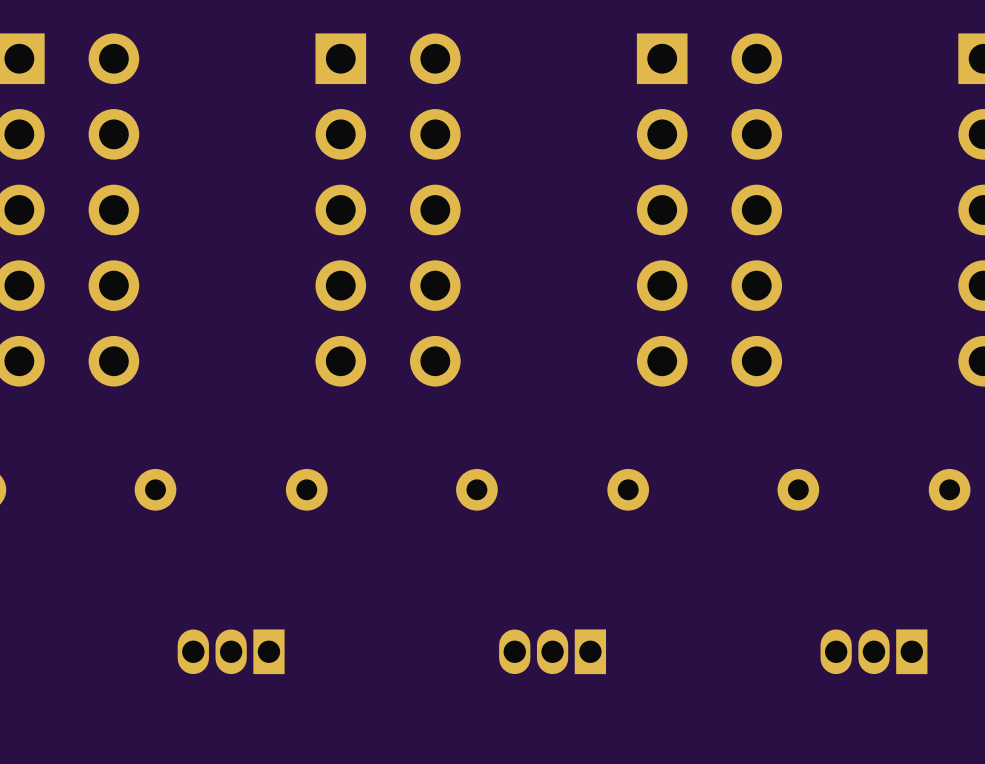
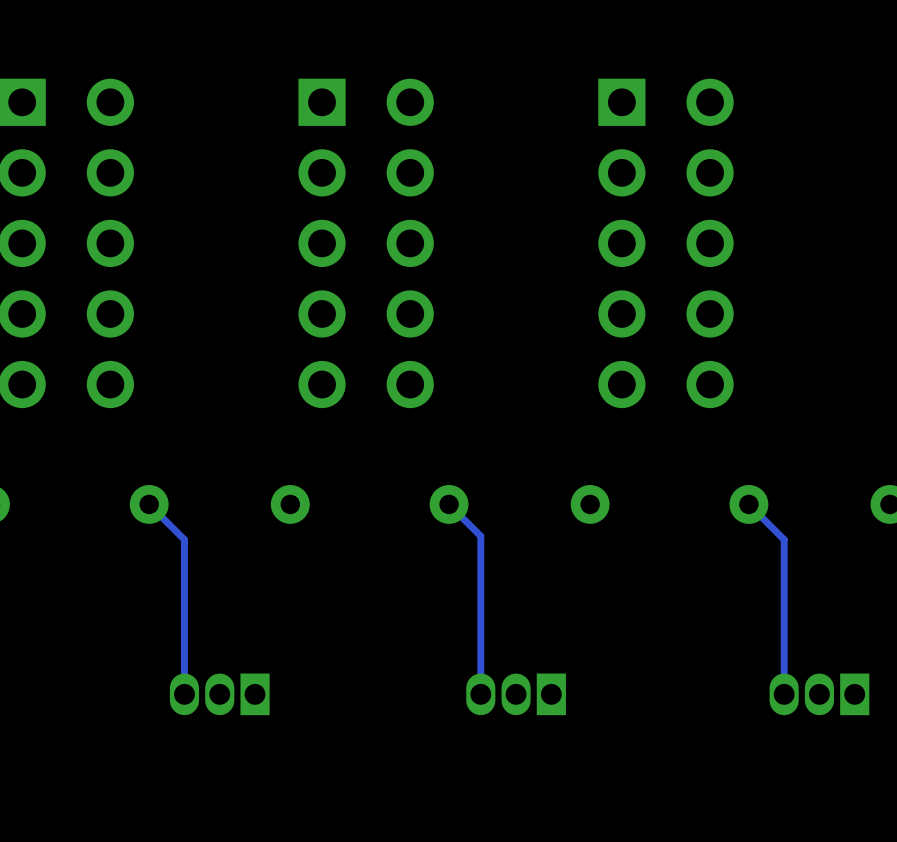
track: none -> (149, 504) (184, 539) (184, 694)
track: none -> (449, 504) (480, 536) (480, 694)
track: none -> (748, 504) (784, 539) (784, 694)
part position: (231, 651) -> (219, 694)
part position: (552, 651) -> (516, 694)
part position: (873, 651) -> (819, 694)

